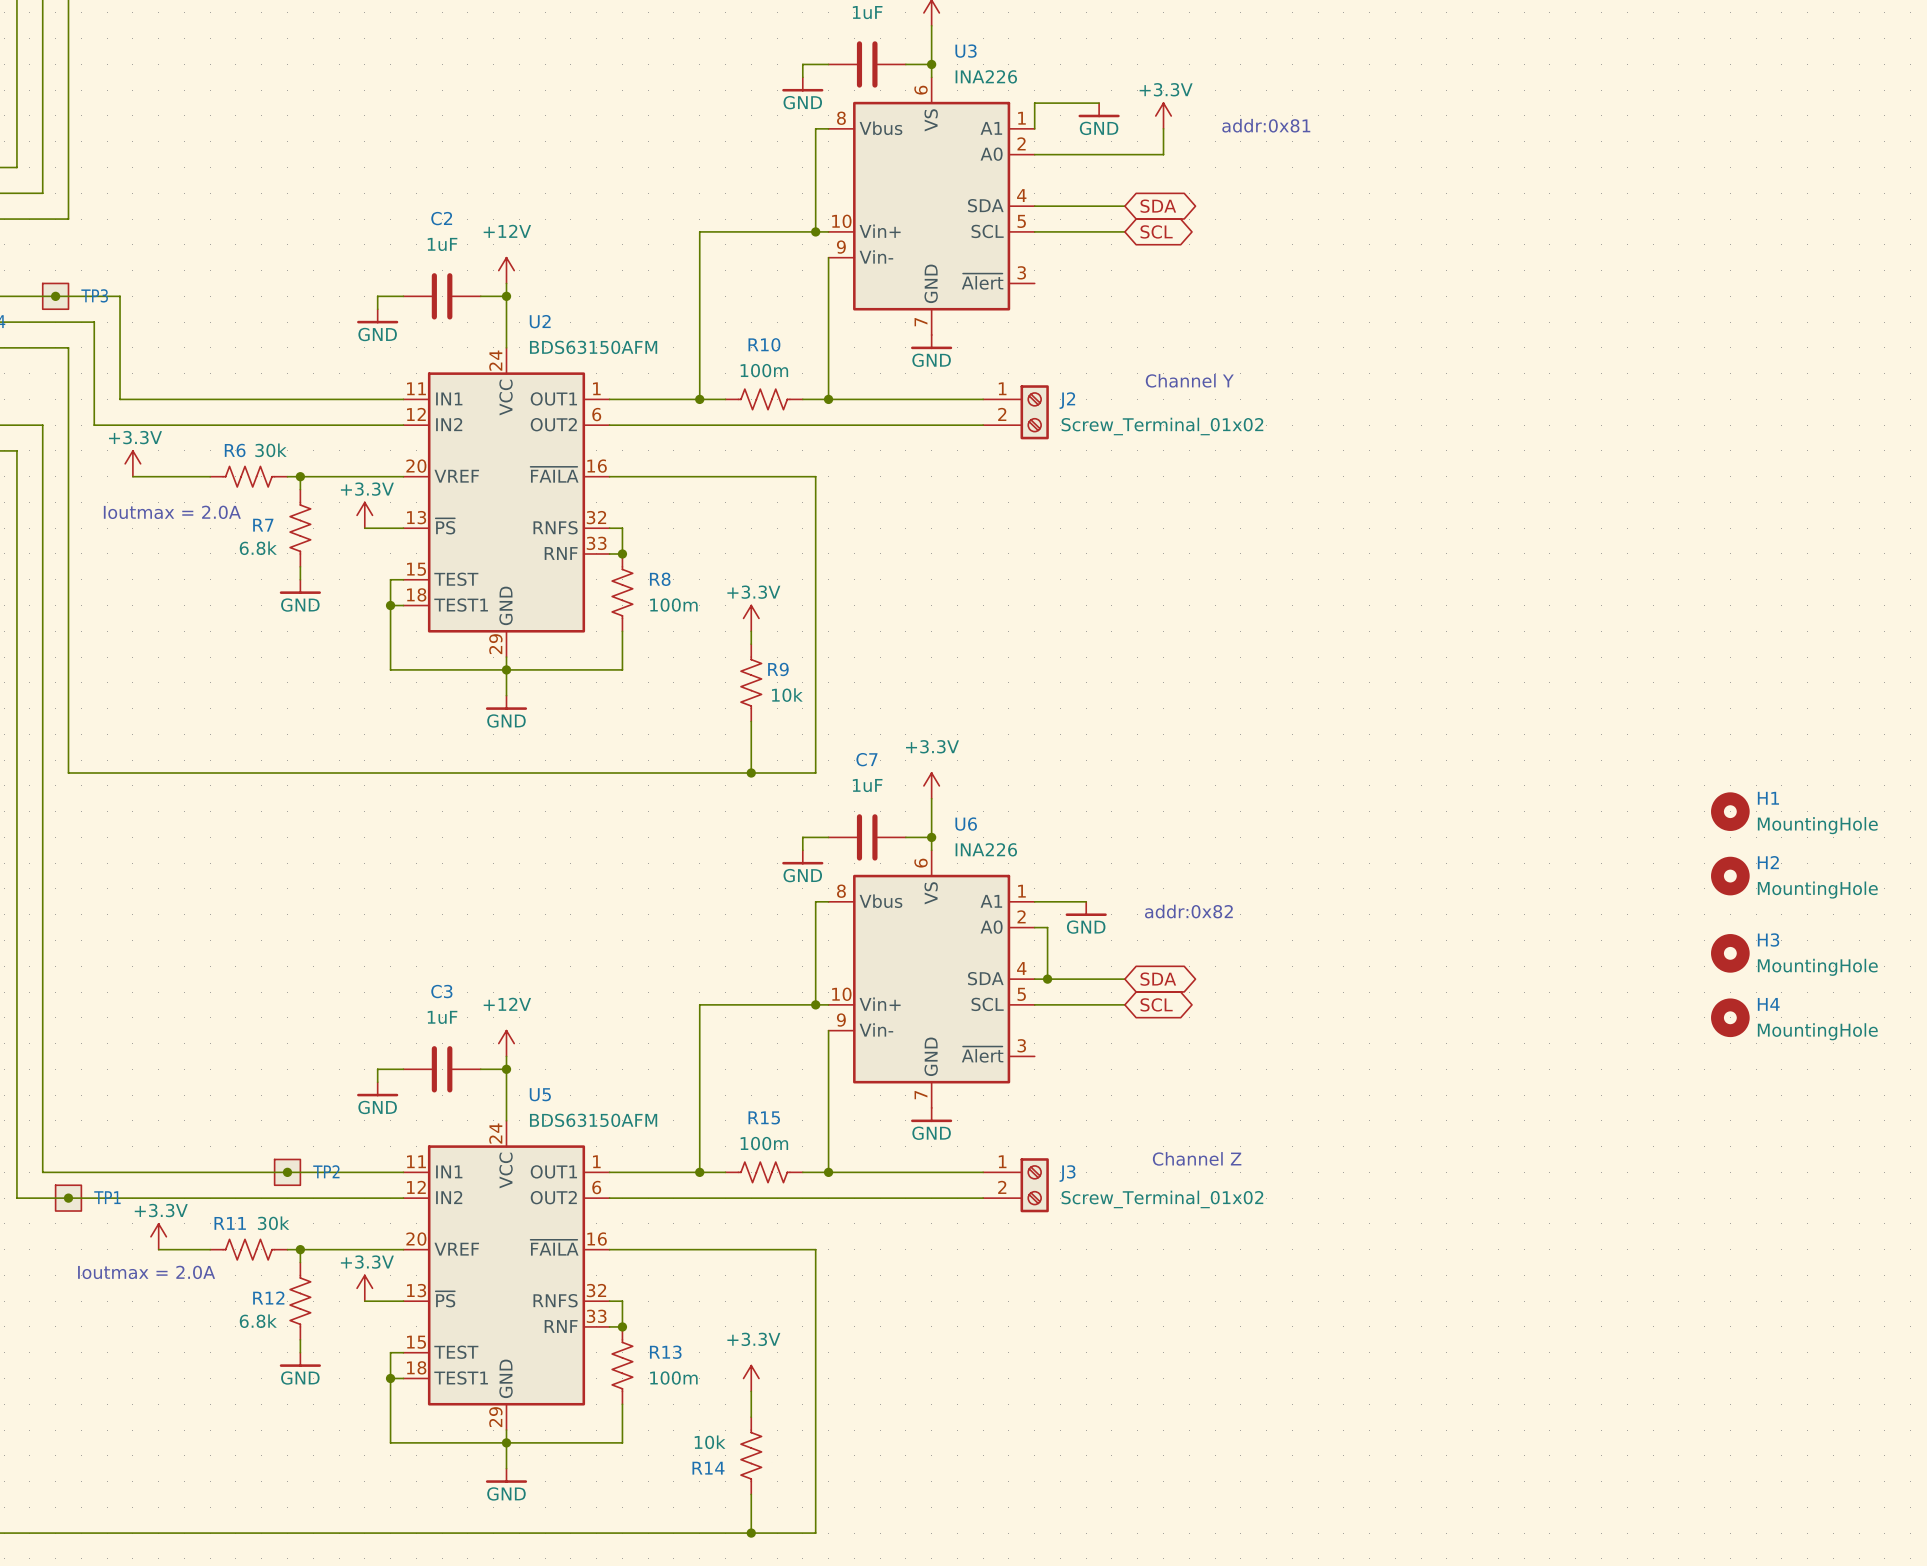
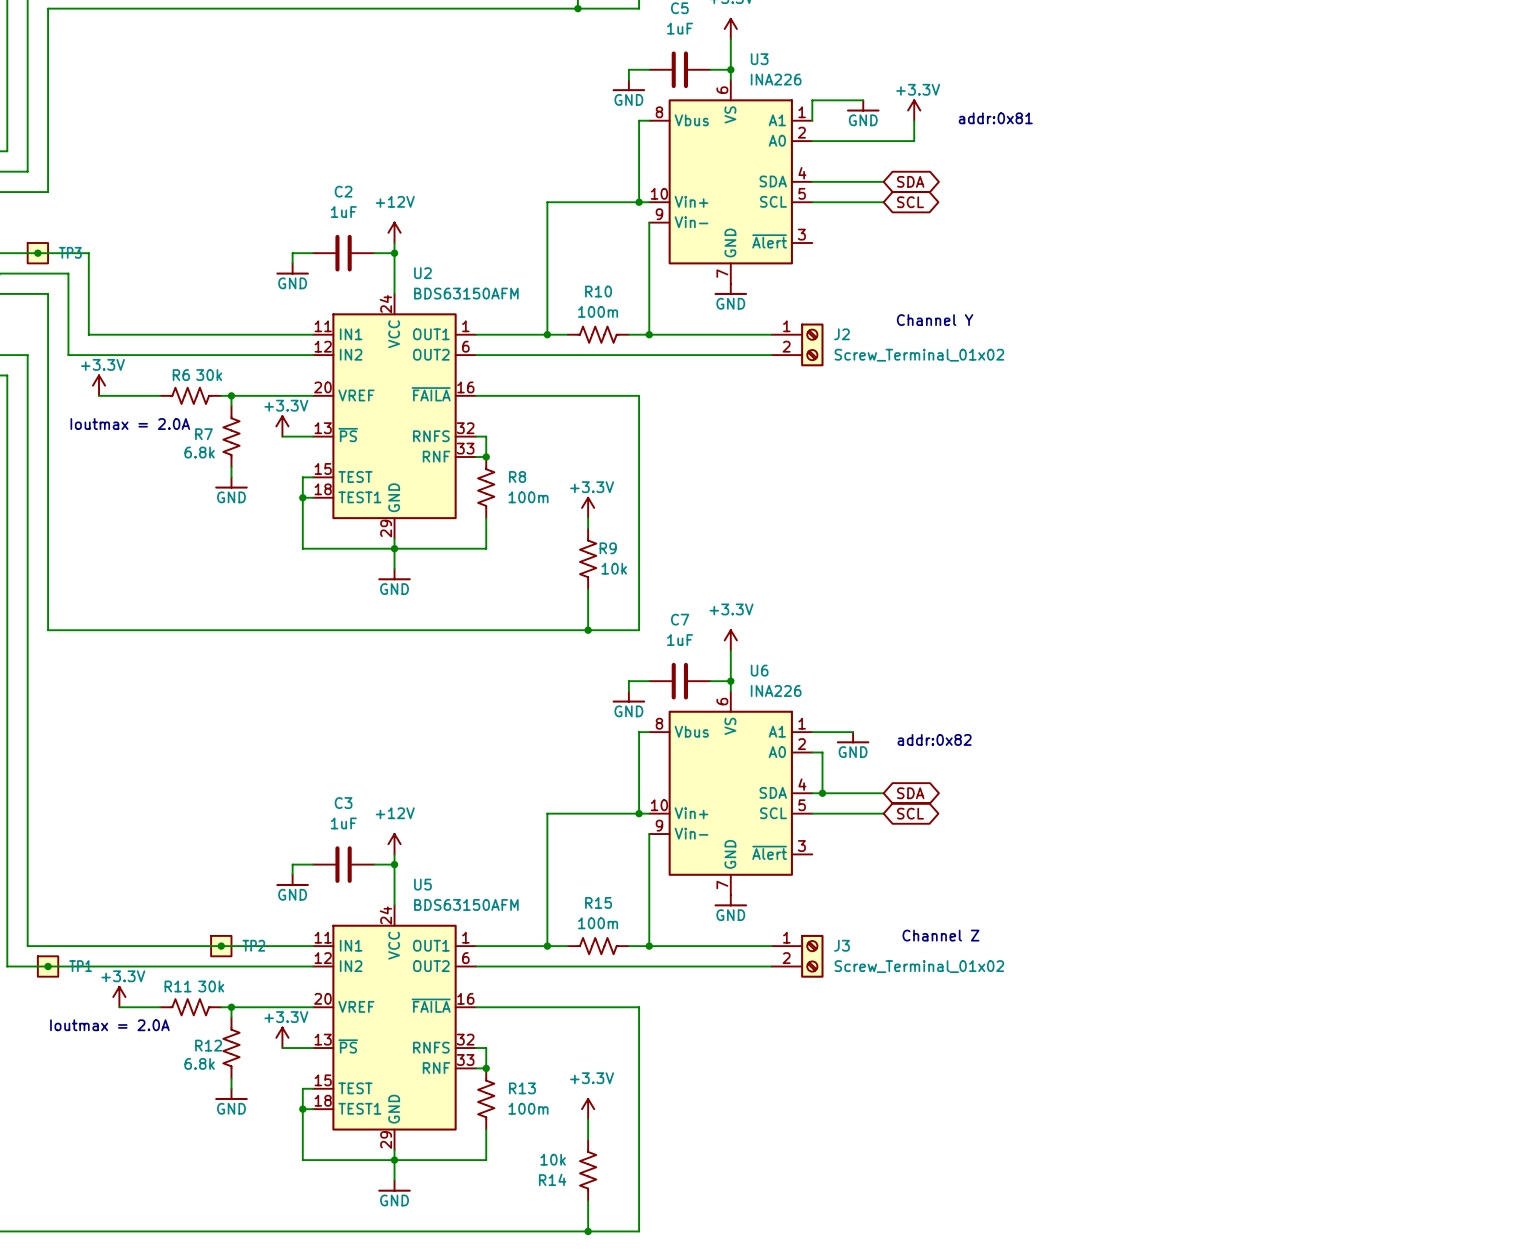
H1: MountingHole (1730, 811) -> none
H2: MountingHole (1730, 876) -> none
H3: MountingHole (1730, 953) -> none
H4: MountingHole (1730, 1017) -> none

